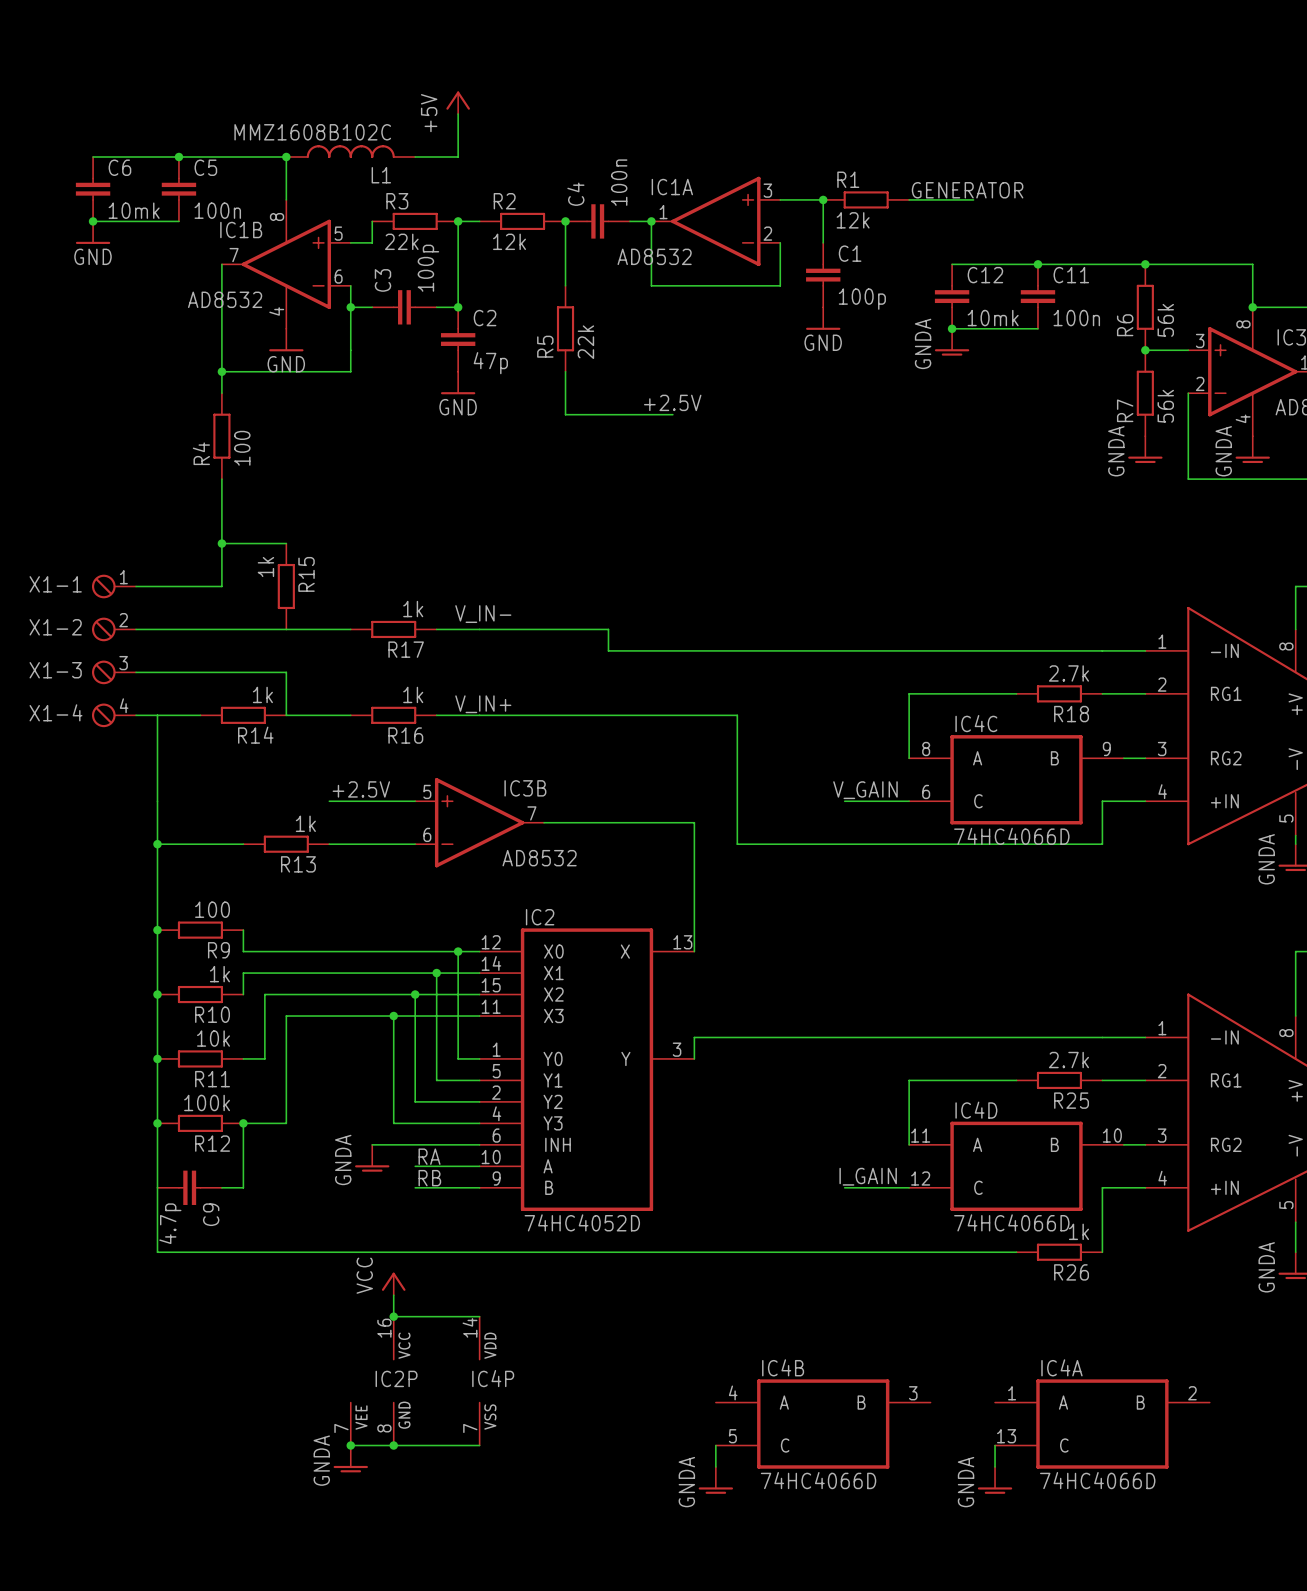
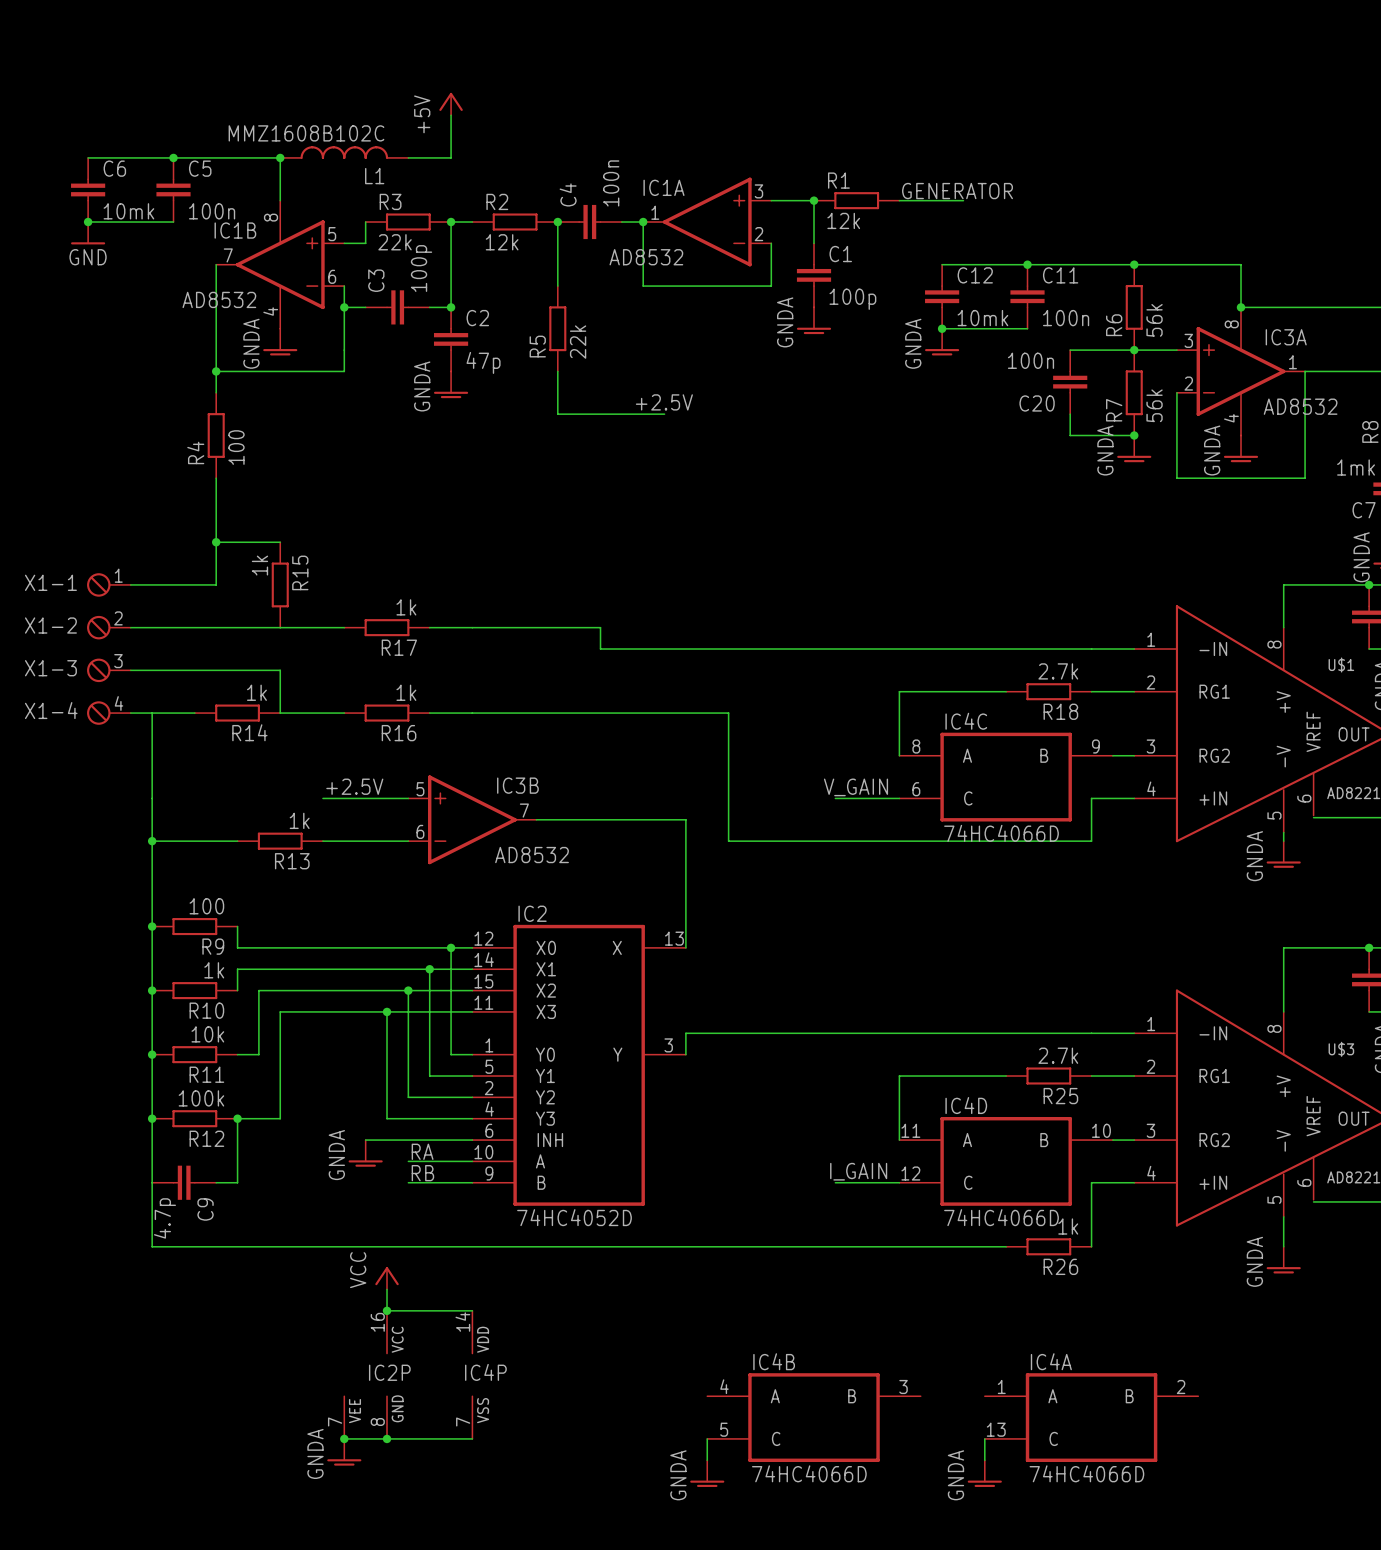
power symbol: GND (823, 318) -> GNDA (814, 320)
power symbol: GND (286, 340) -> GNDA (280, 342)
wire: none -> (1070, 350) (1134, 350)
C20: none -> 100n (1070, 382)
power symbol: GND (458, 383) -> GNDA (451, 384)
wire: none -> (1070, 414) (1070, 435) (1134, 435)
junction: none -> (1134, 435)
label: V_IN- (483, 614) -> none
label: V_IN+ (483, 704) -> none

